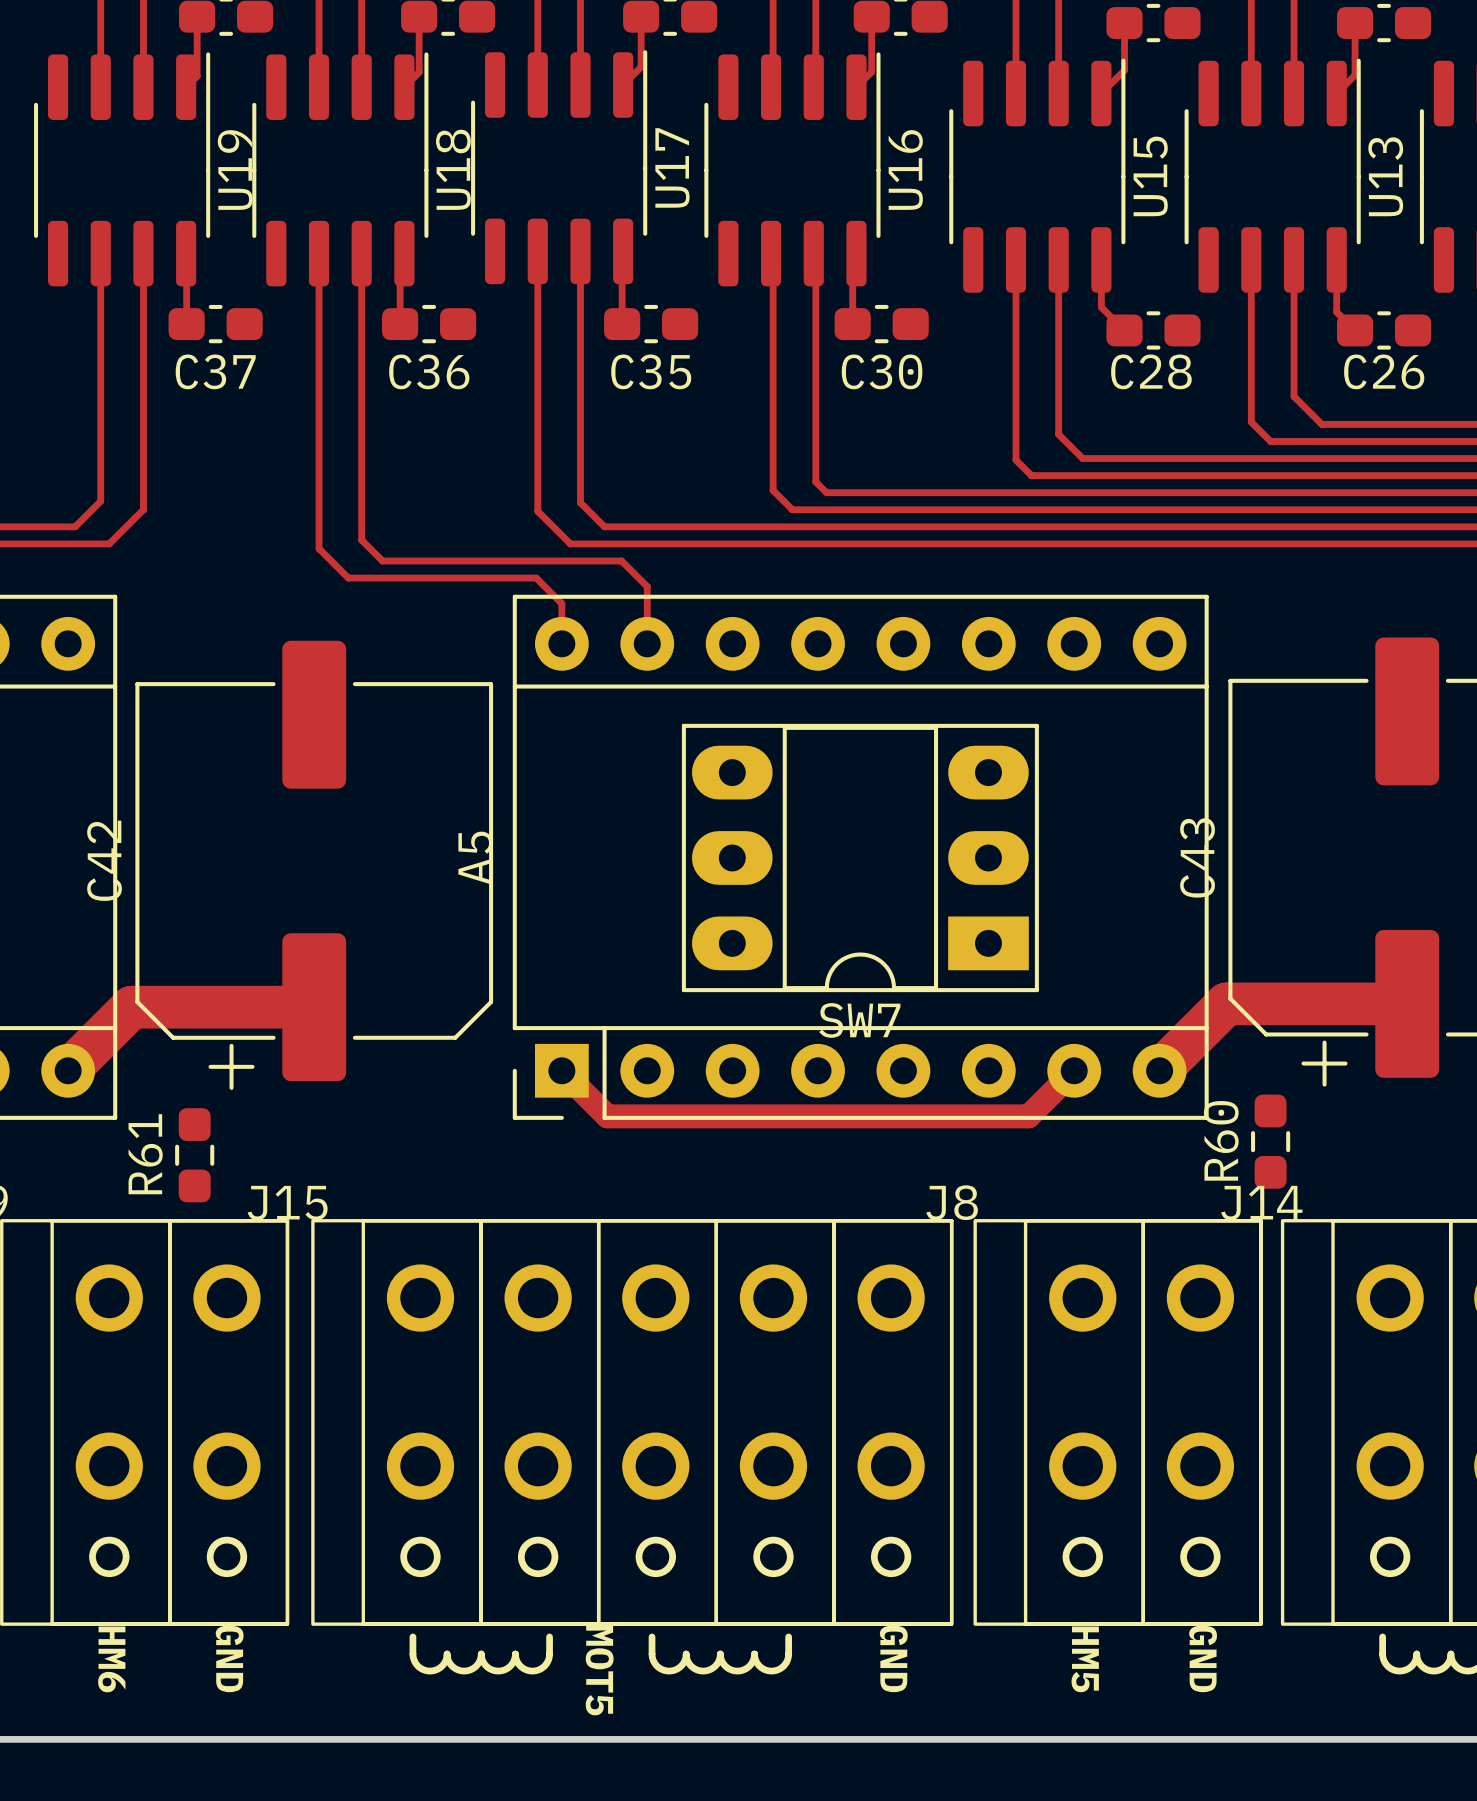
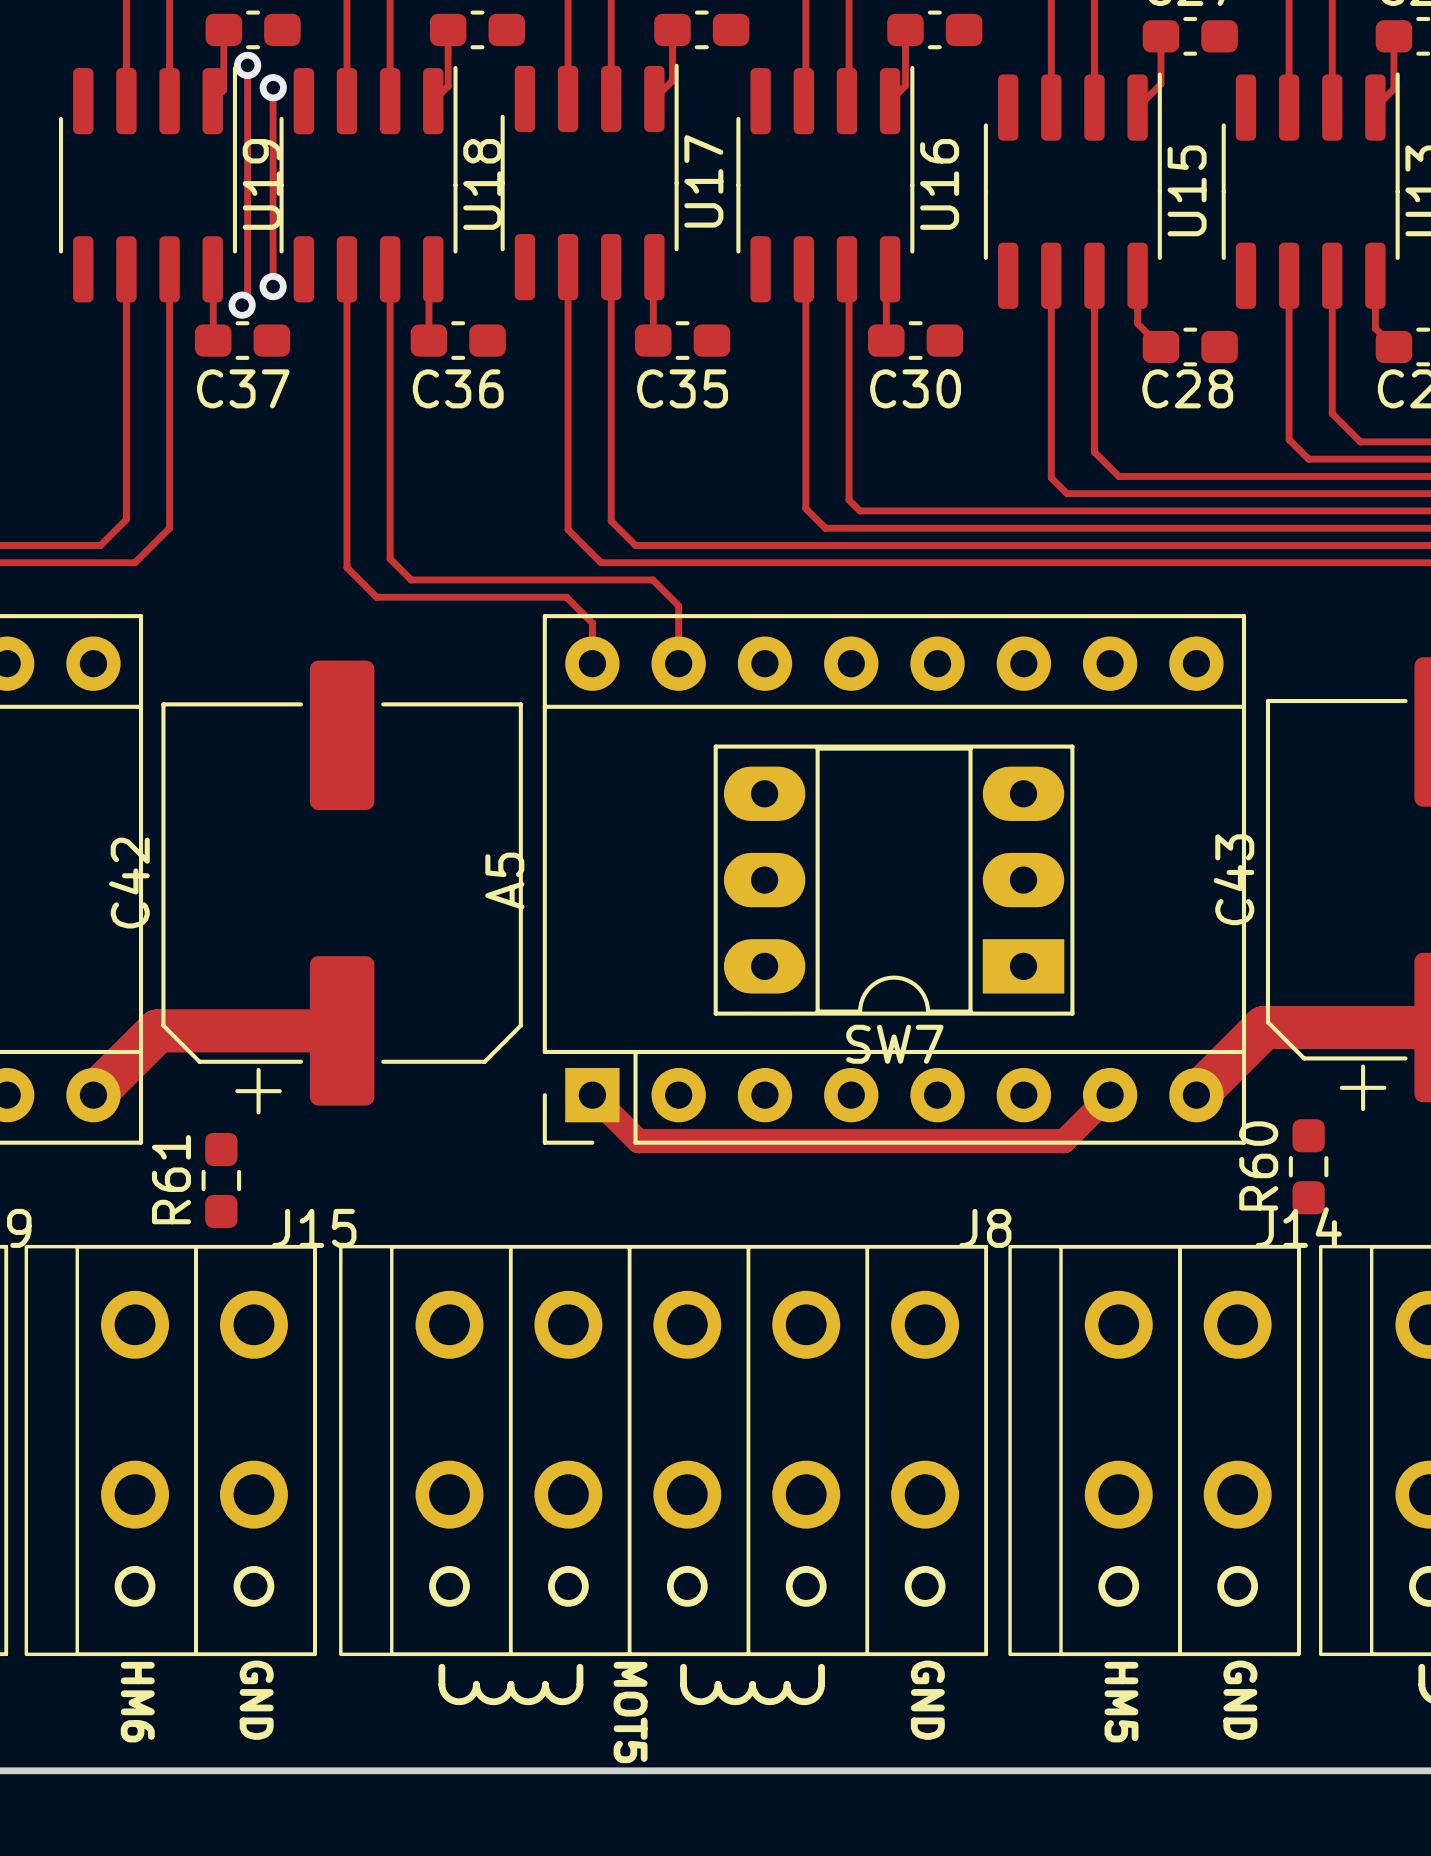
track: none -> (247, 65) (247, 299) (242, 305)
via: none -> (247, 65)
via: none -> (273, 87)
track: none -> (273, 87) (273, 286)
via: none -> (273, 286)
via: none -> (242, 305)

